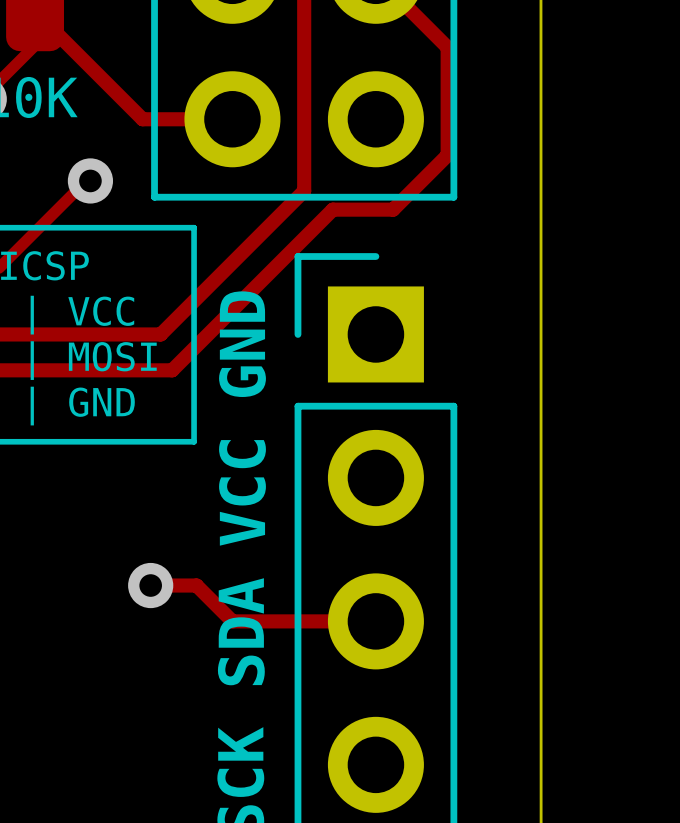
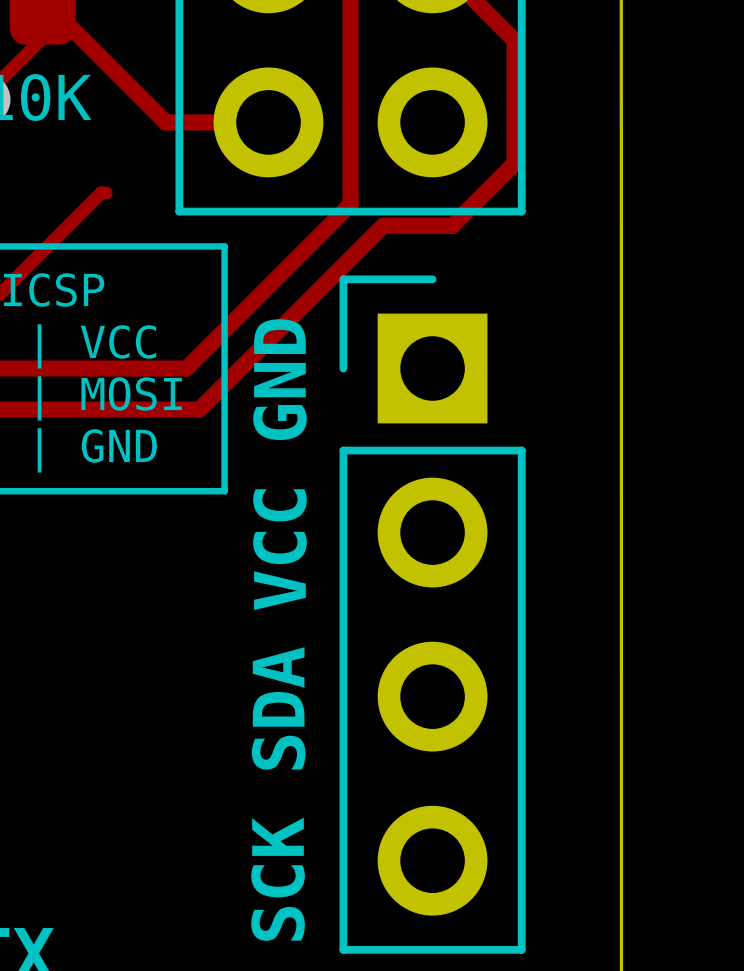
via: (90, 180) -> none
track: (150, 585) (196, 585) (232, 621) (375, 621) -> none
via: (150, 585) -> none

